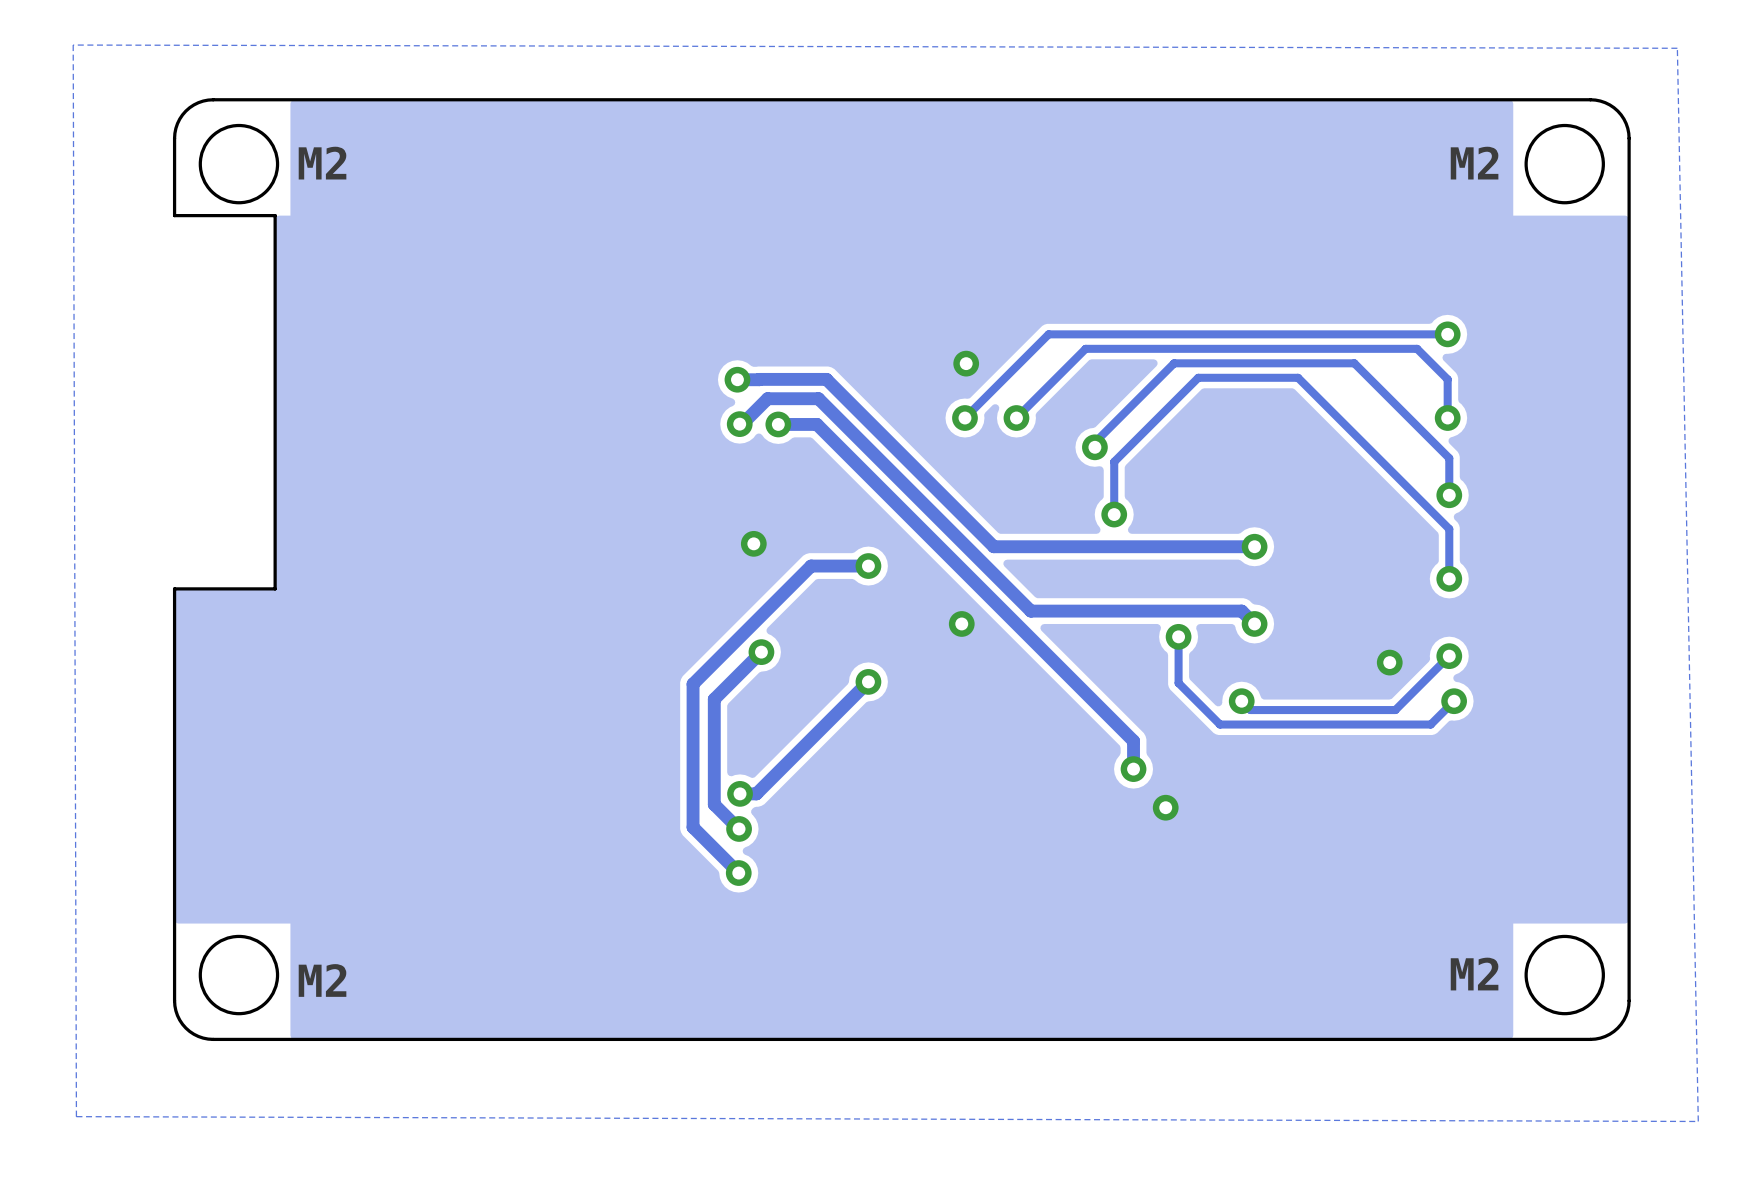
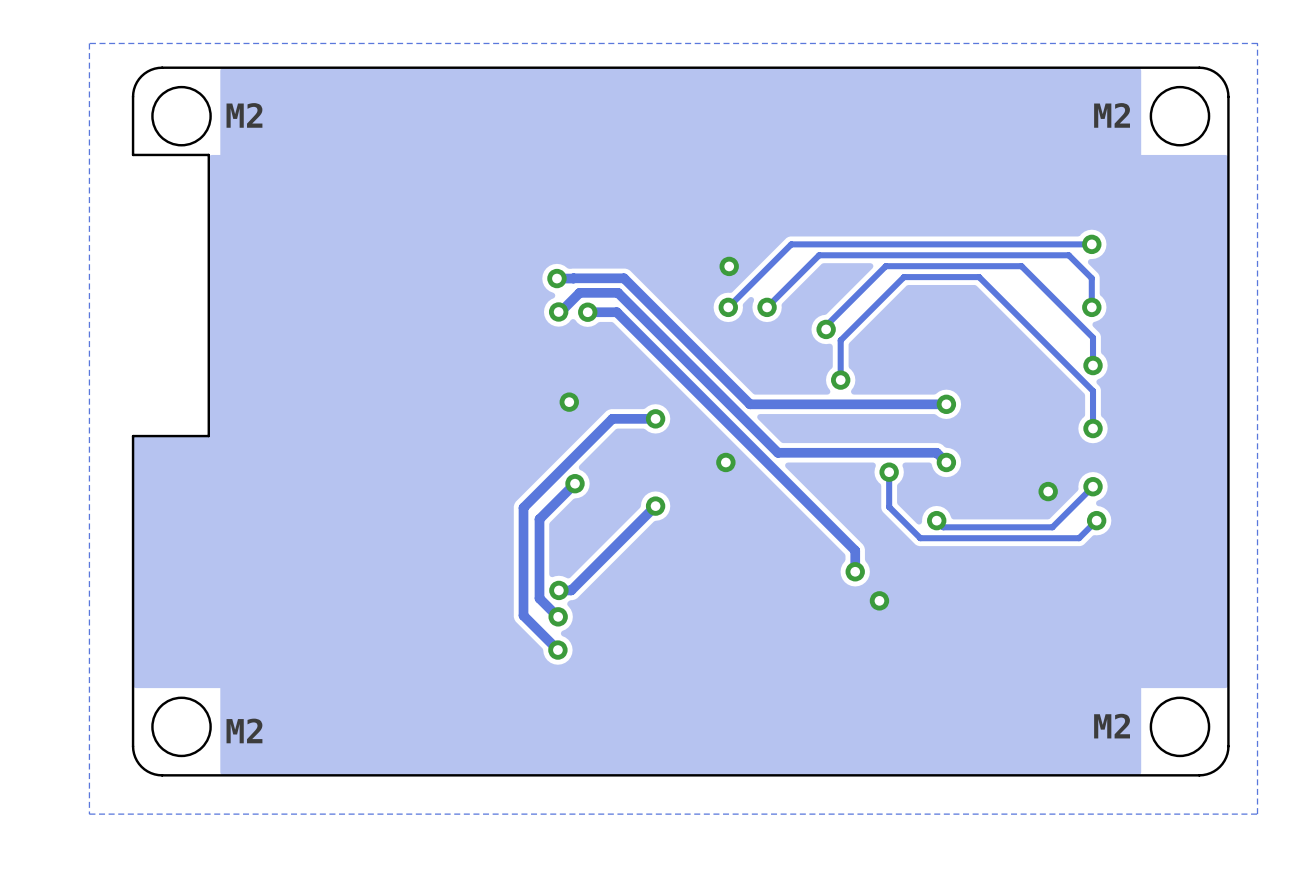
zone outline: (73, 45) (1677, 48) (1698, 1121) (76, 1116) (73, 45) -> (1257, 43) (1257, 814) (89, 814) (89, 43) (1257, 43)

